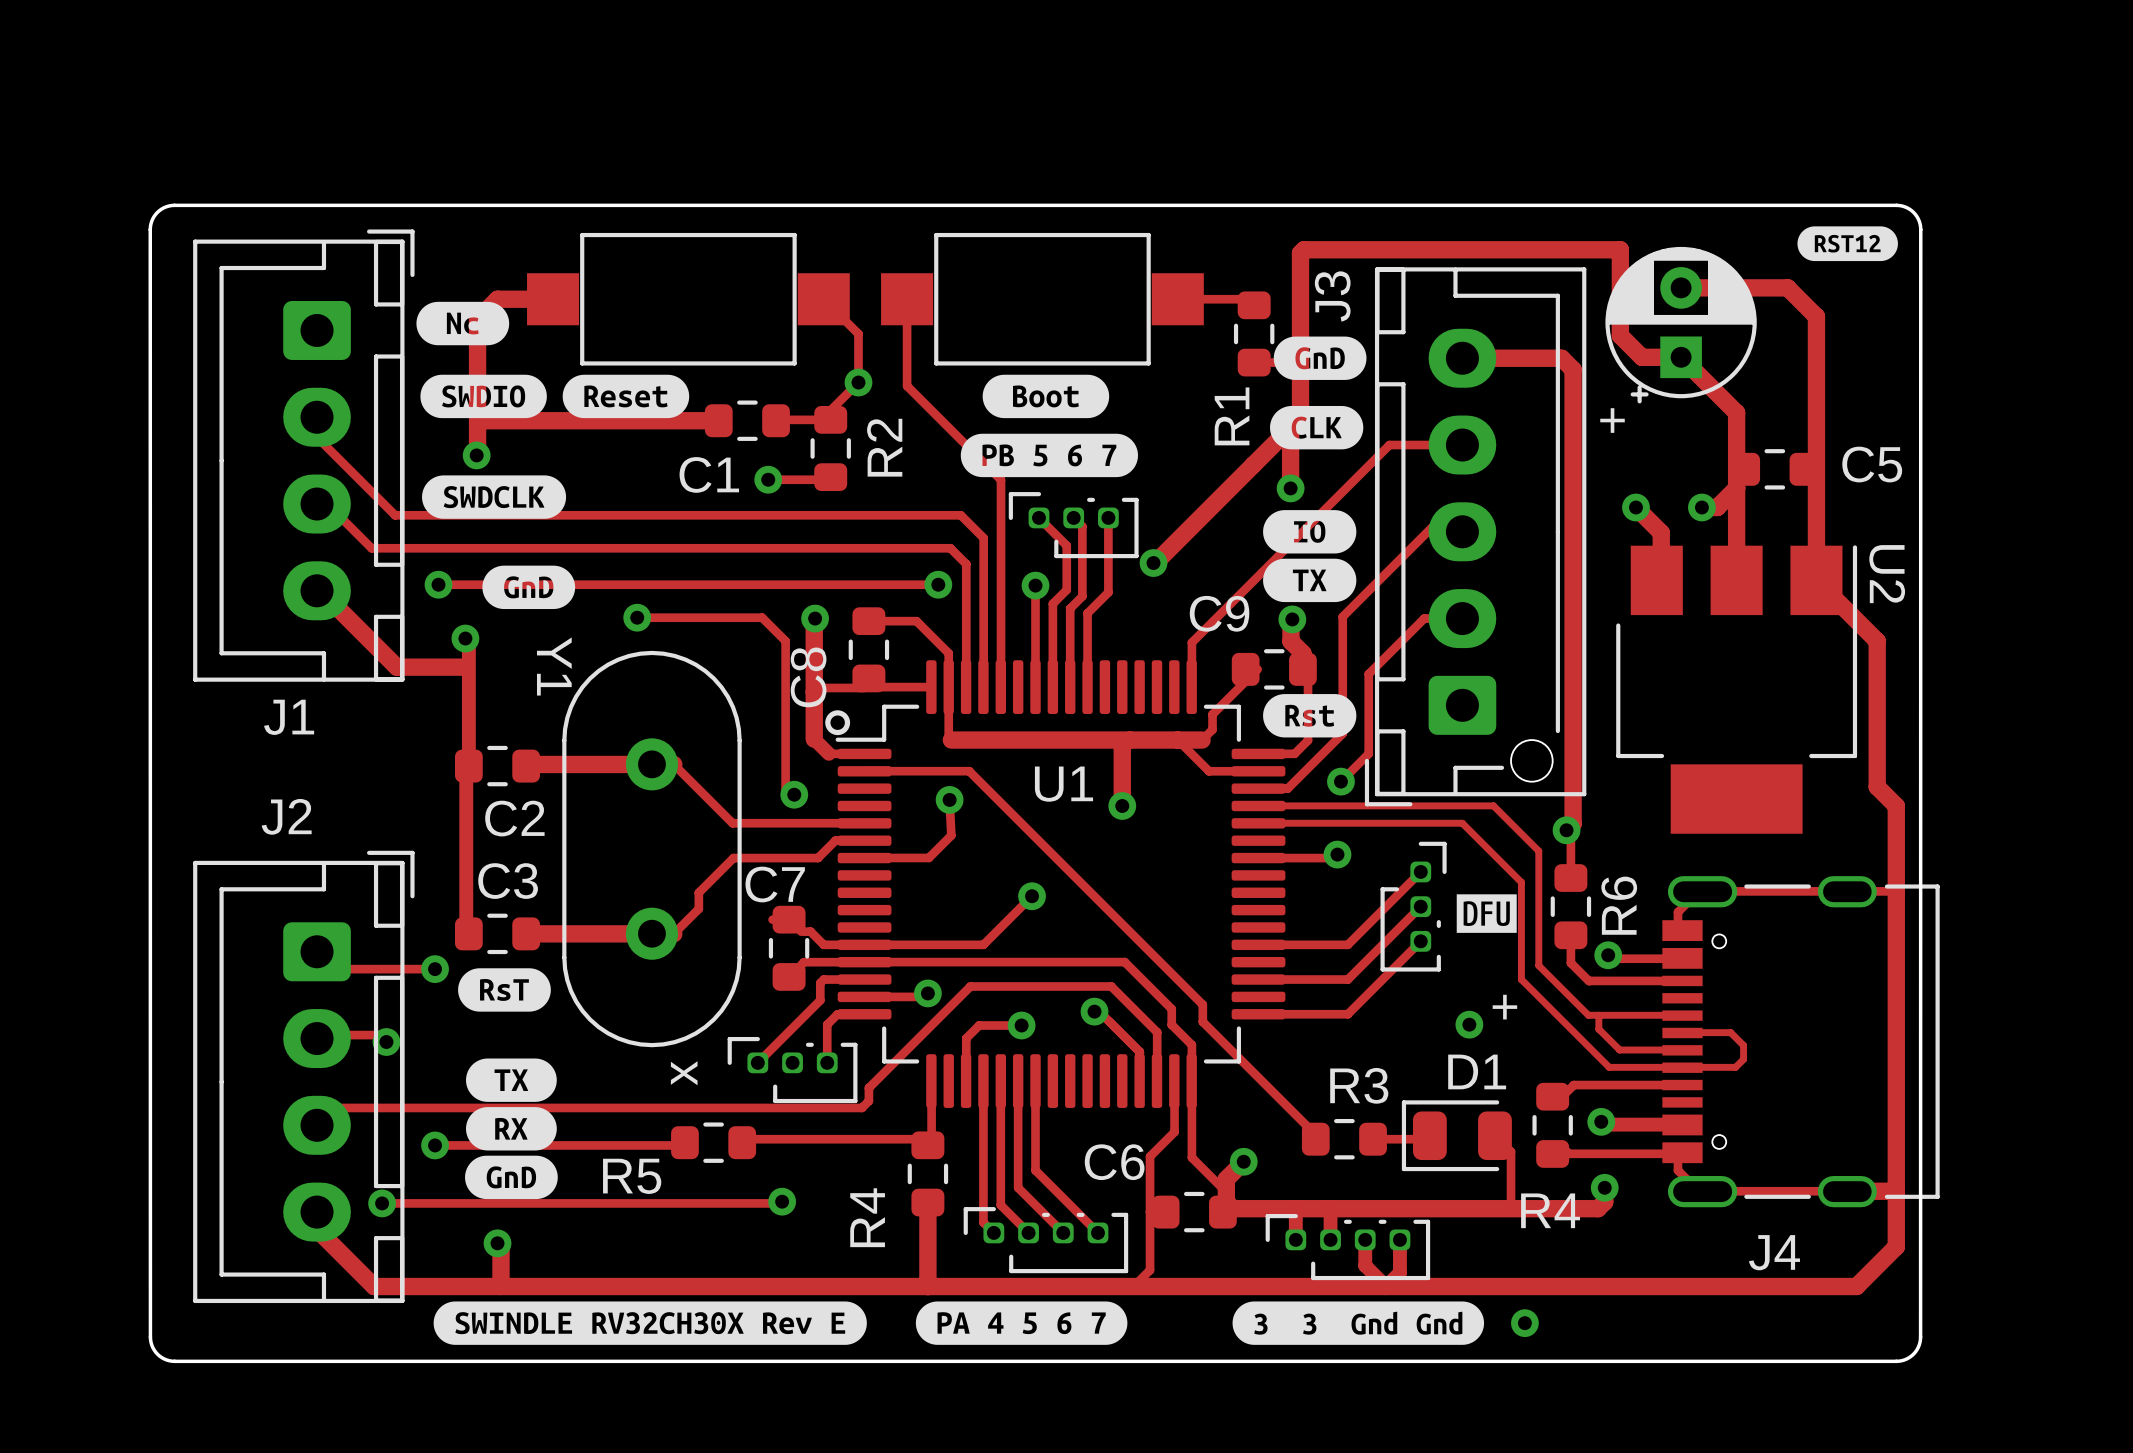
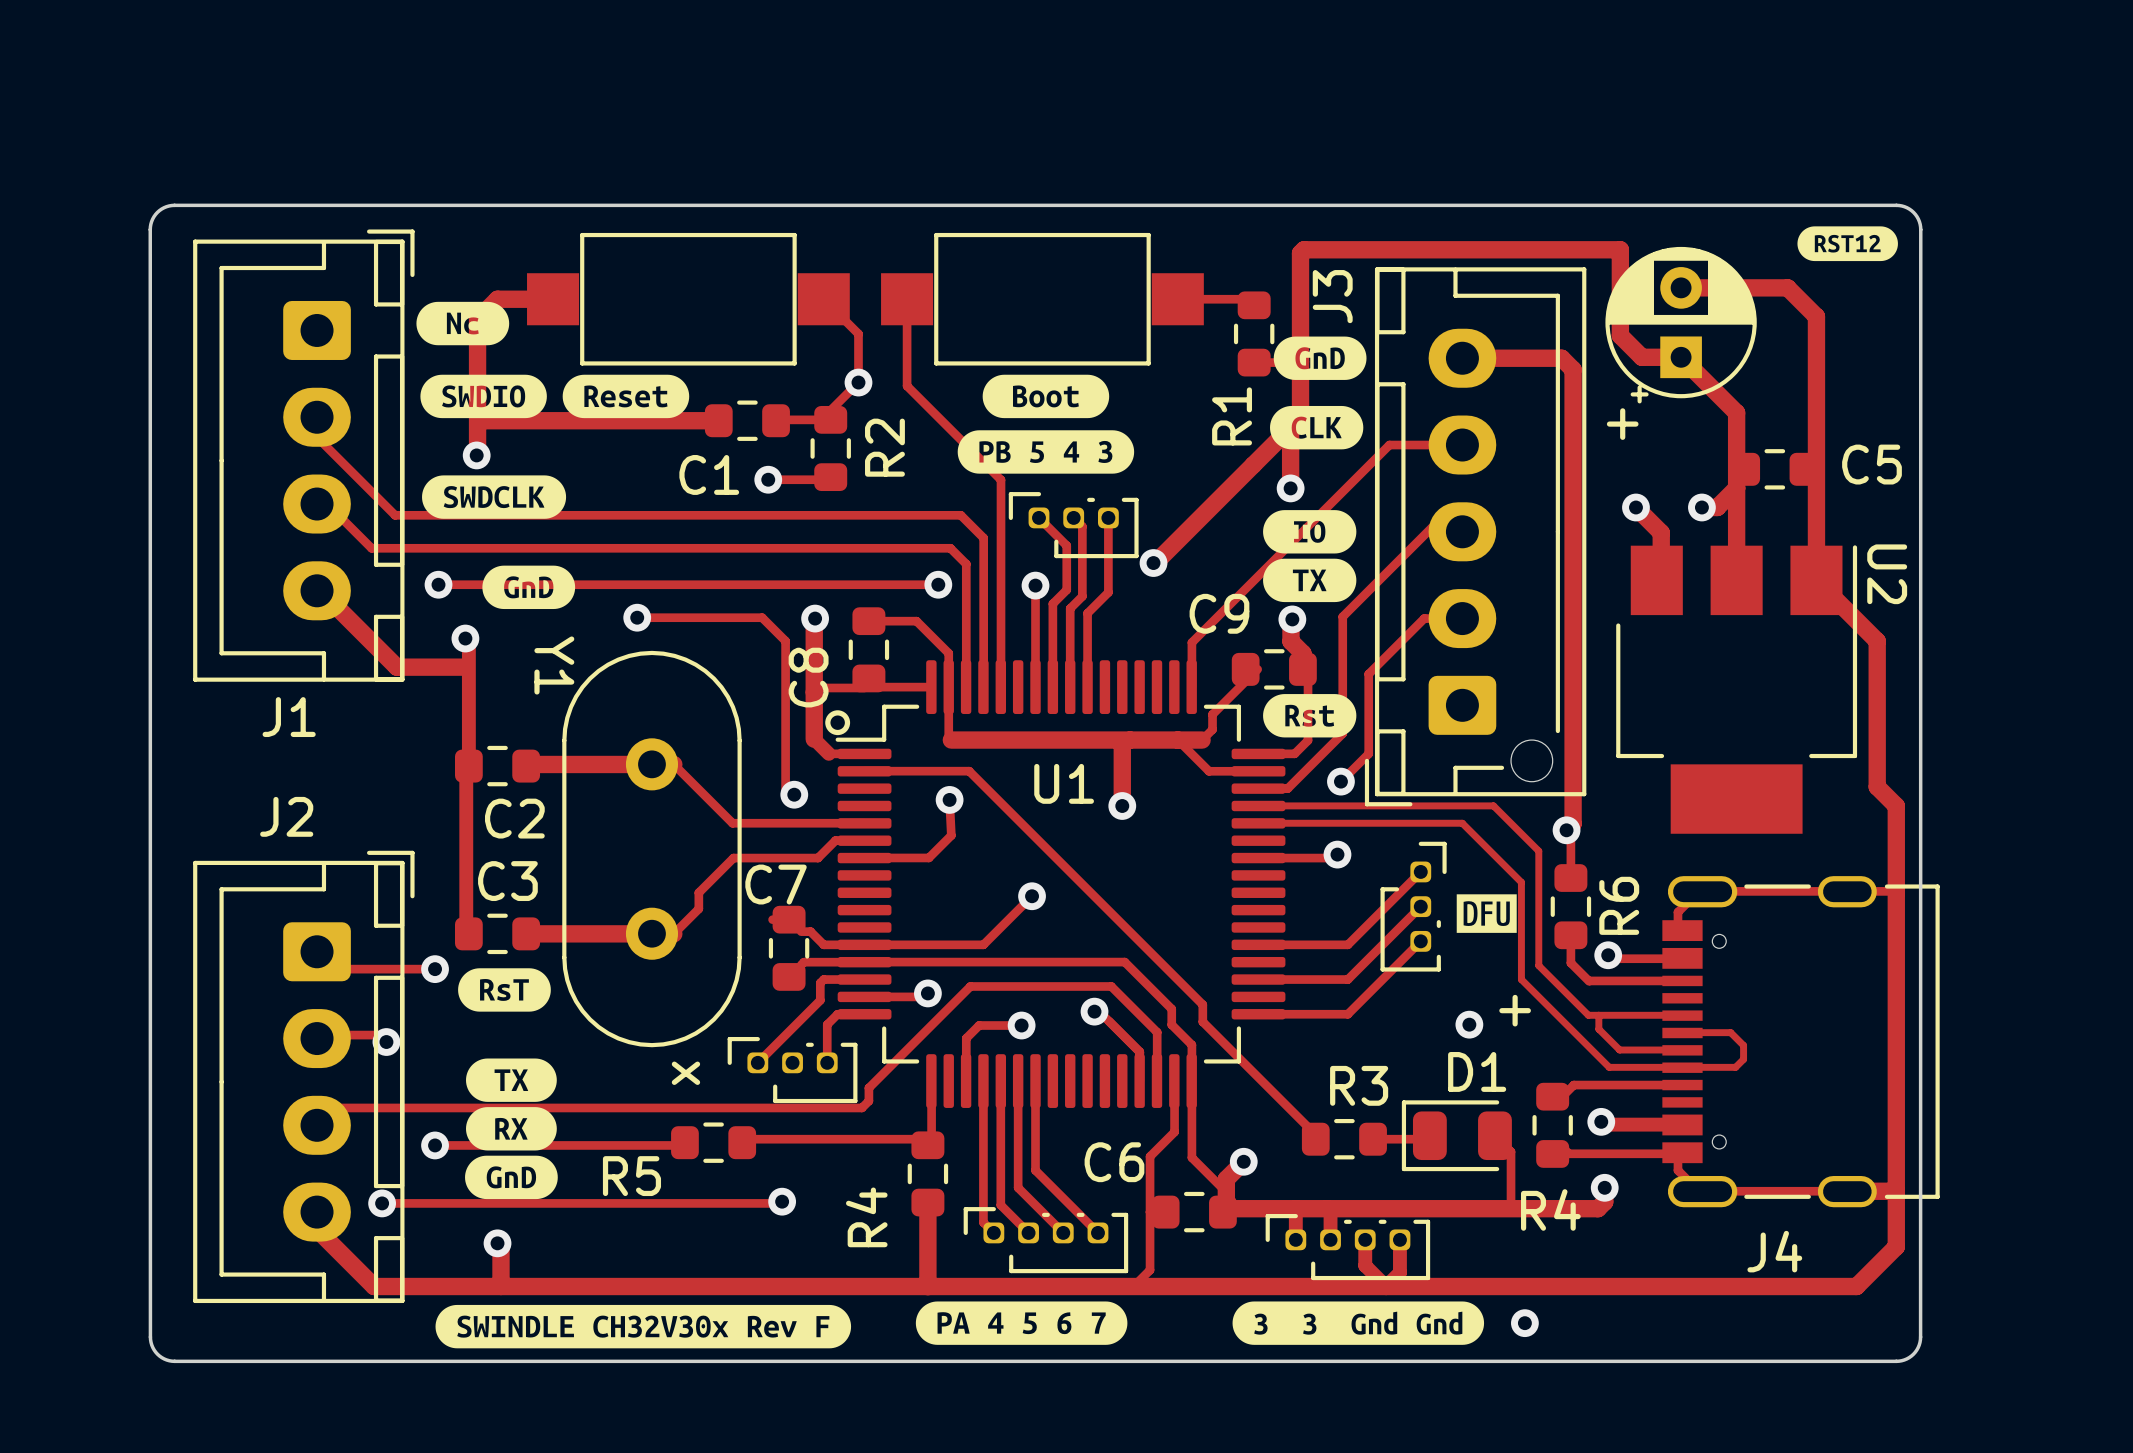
drawing shape: [960, 433, 1139, 478] -> [957, 430, 1135, 474]
drawing shape: [433, 1301, 867, 1345] -> [435, 1304, 852, 1349]

